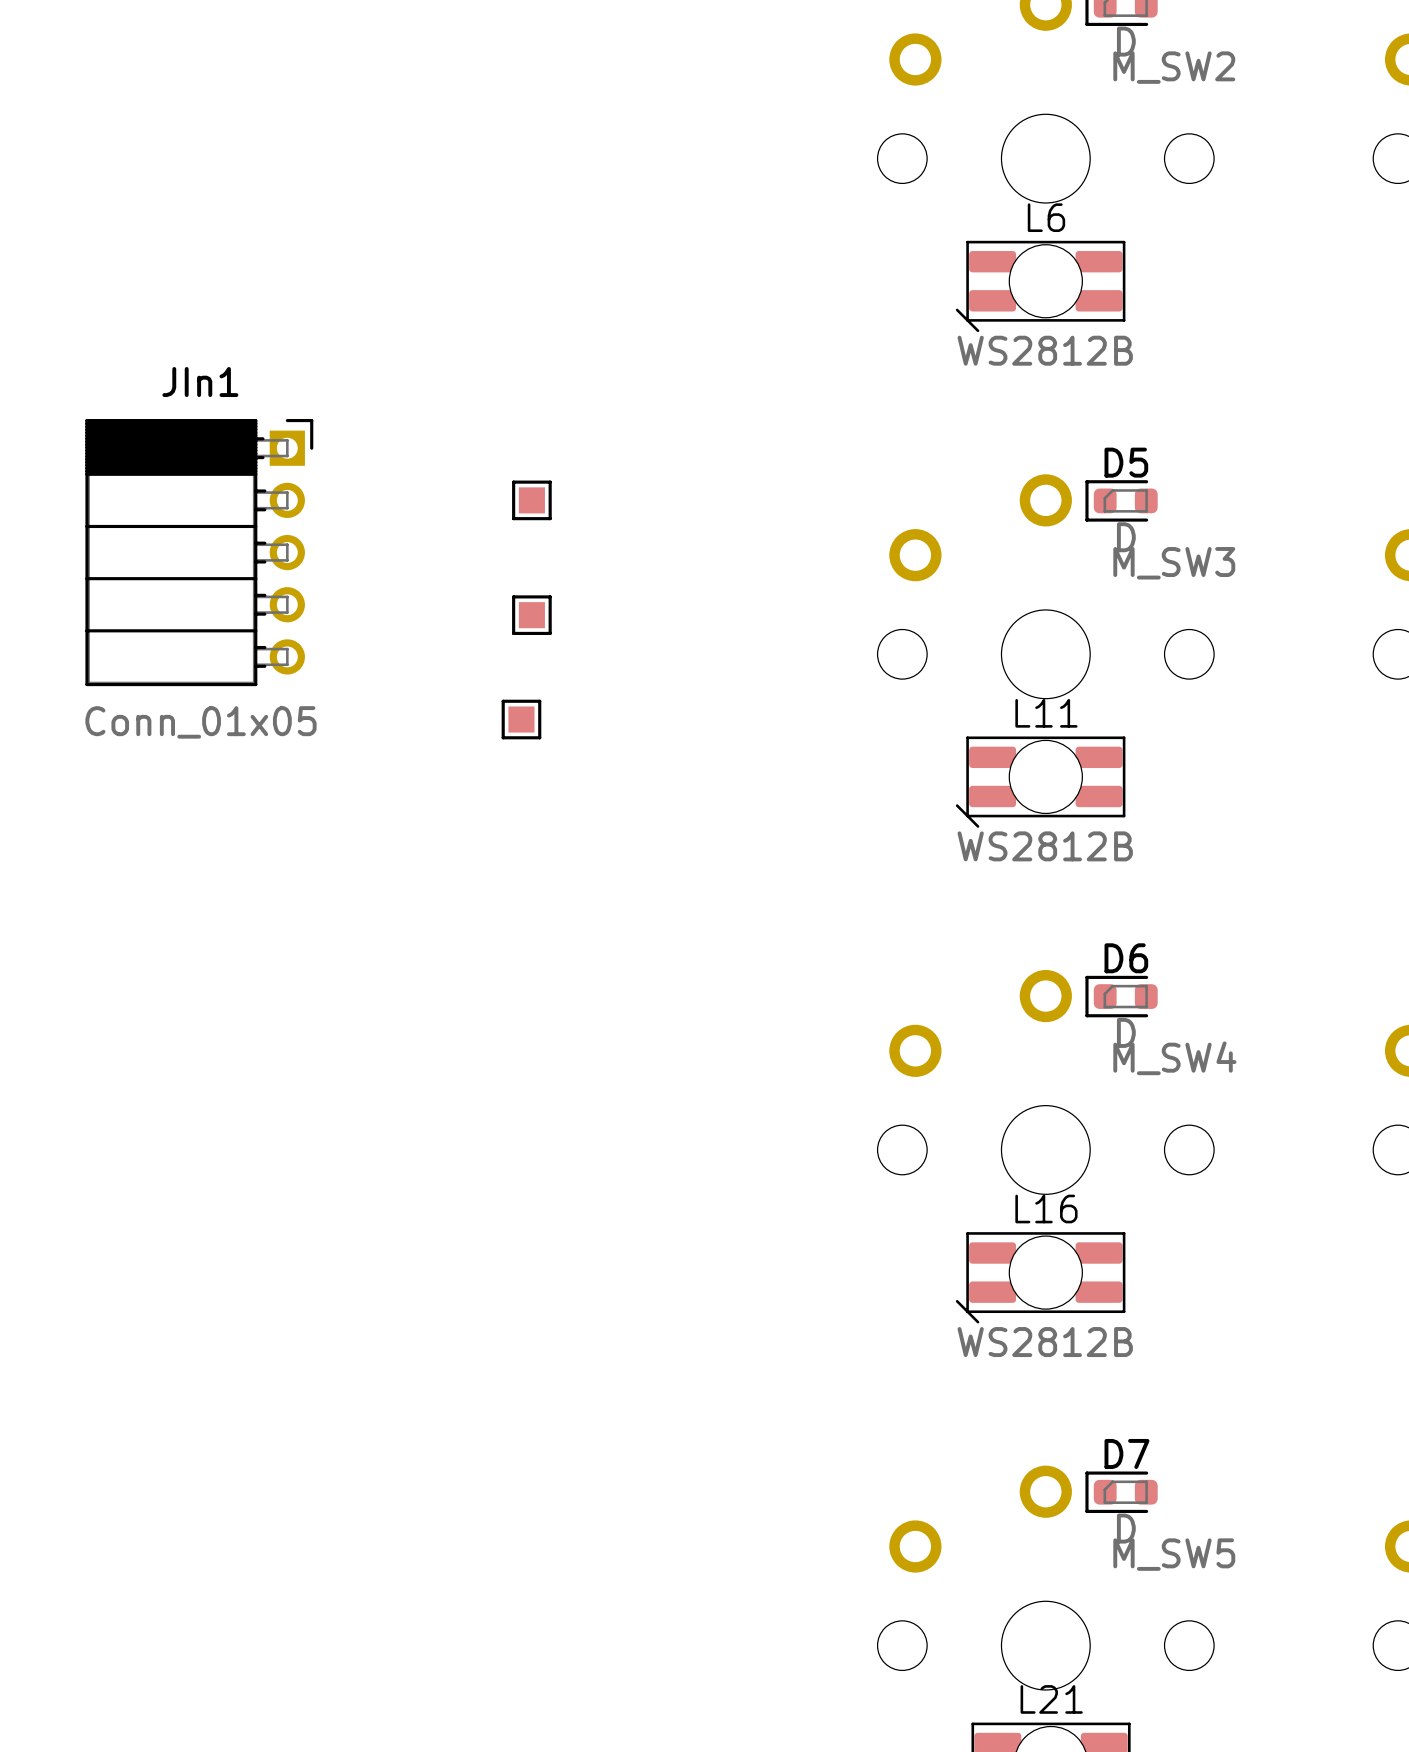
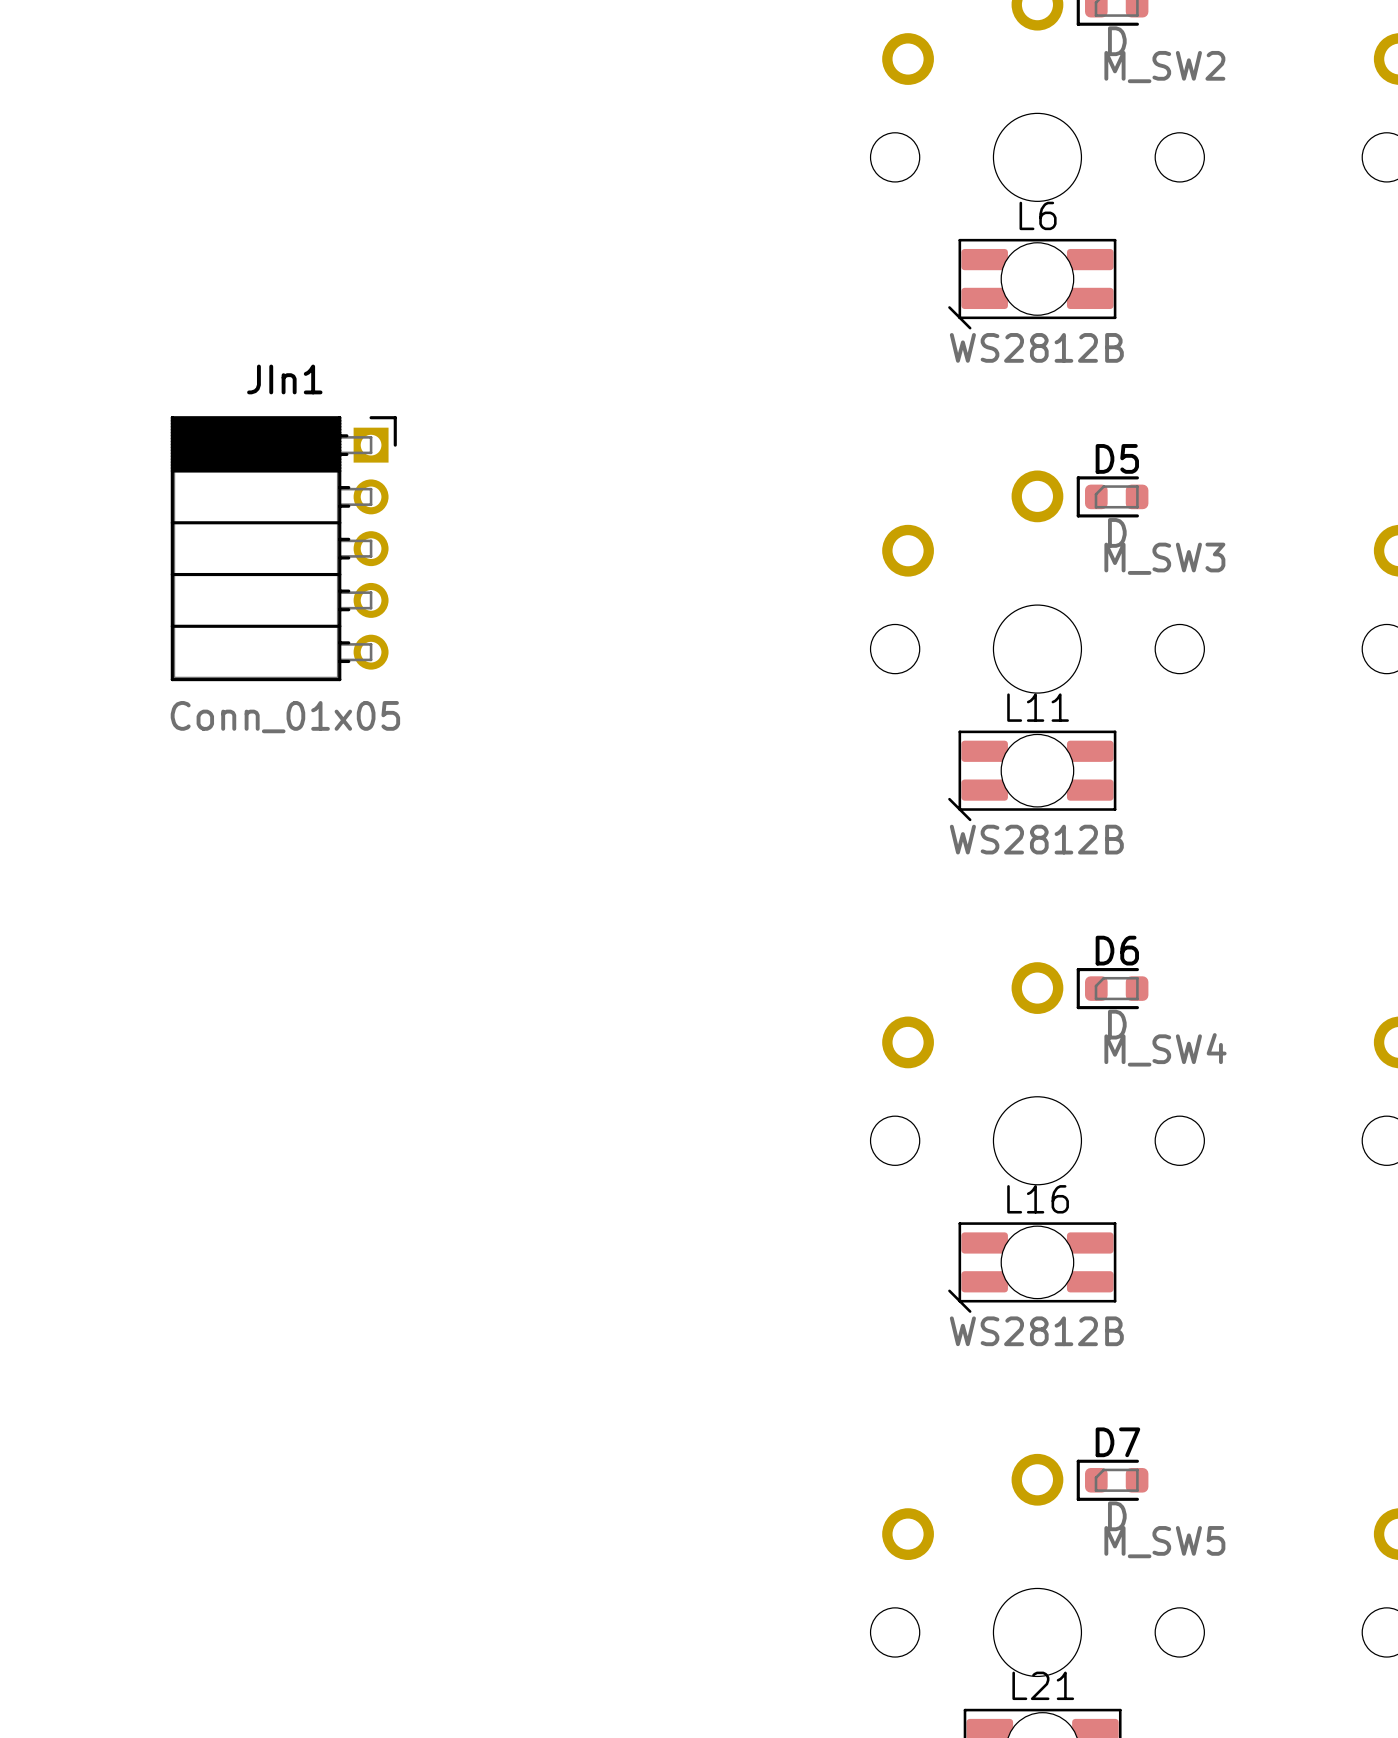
part: (531, 500) -> none
JIn1 position: (199, 552) -> (283, 548)
part: (531, 615) -> none
part: (521, 719) -> none

